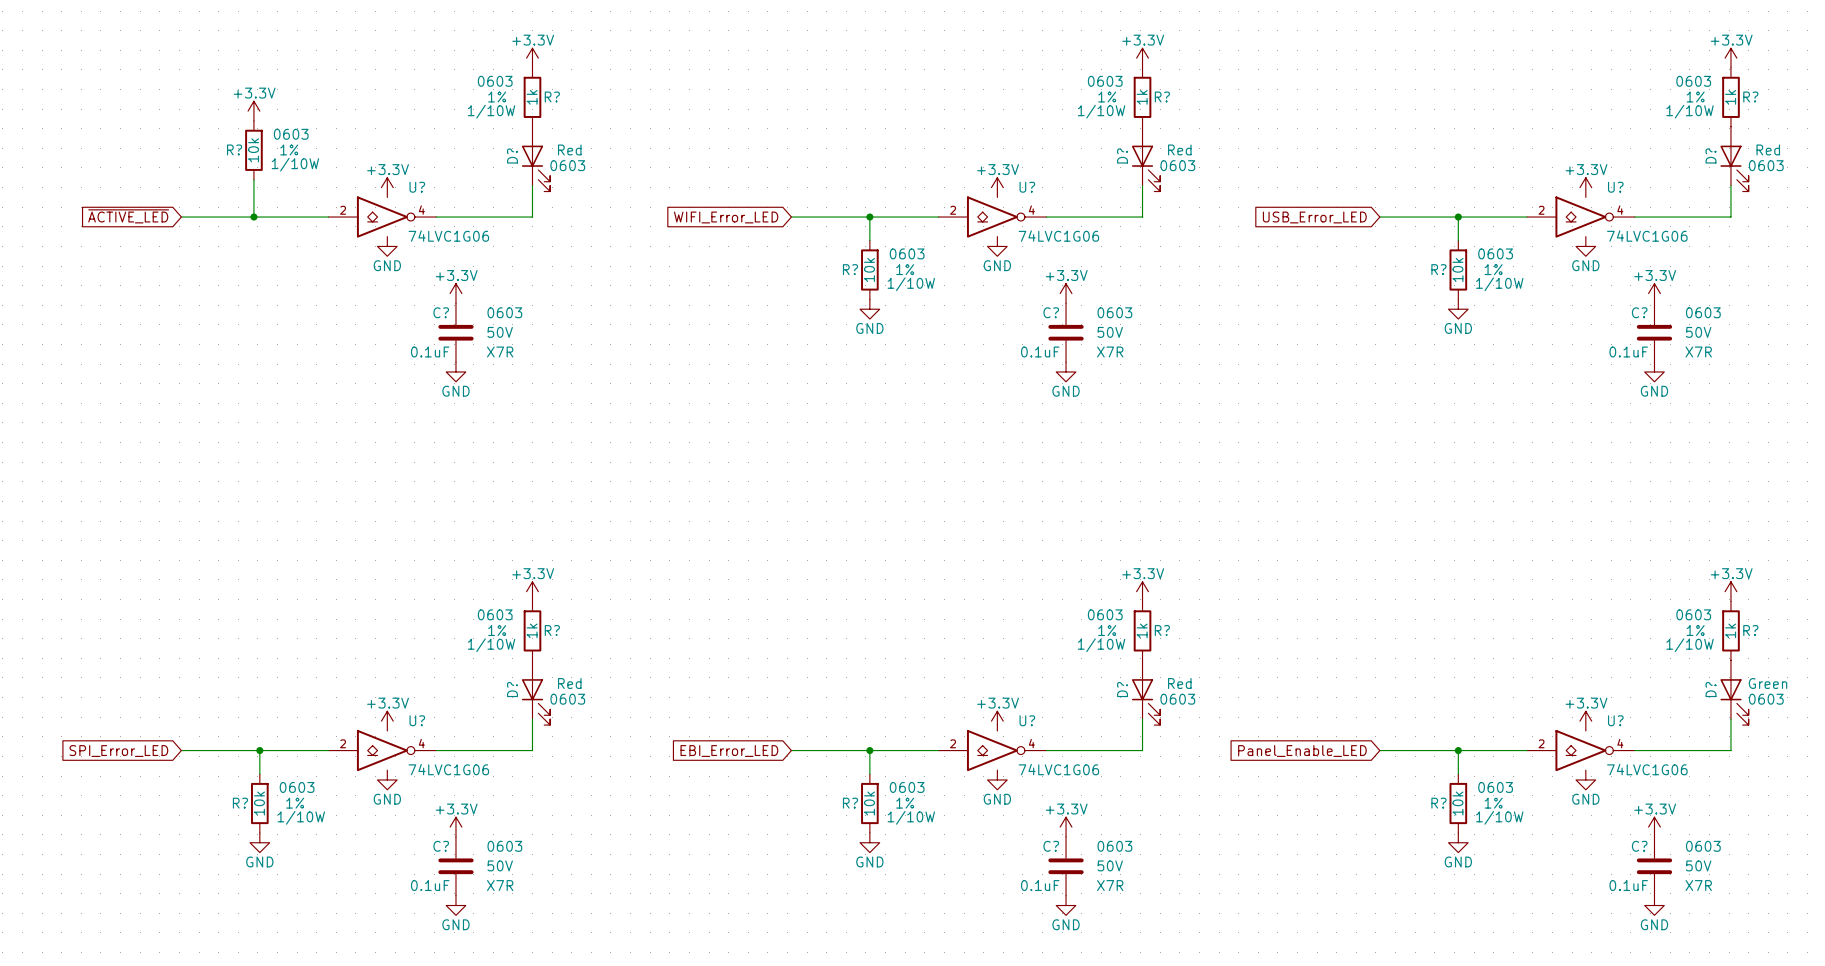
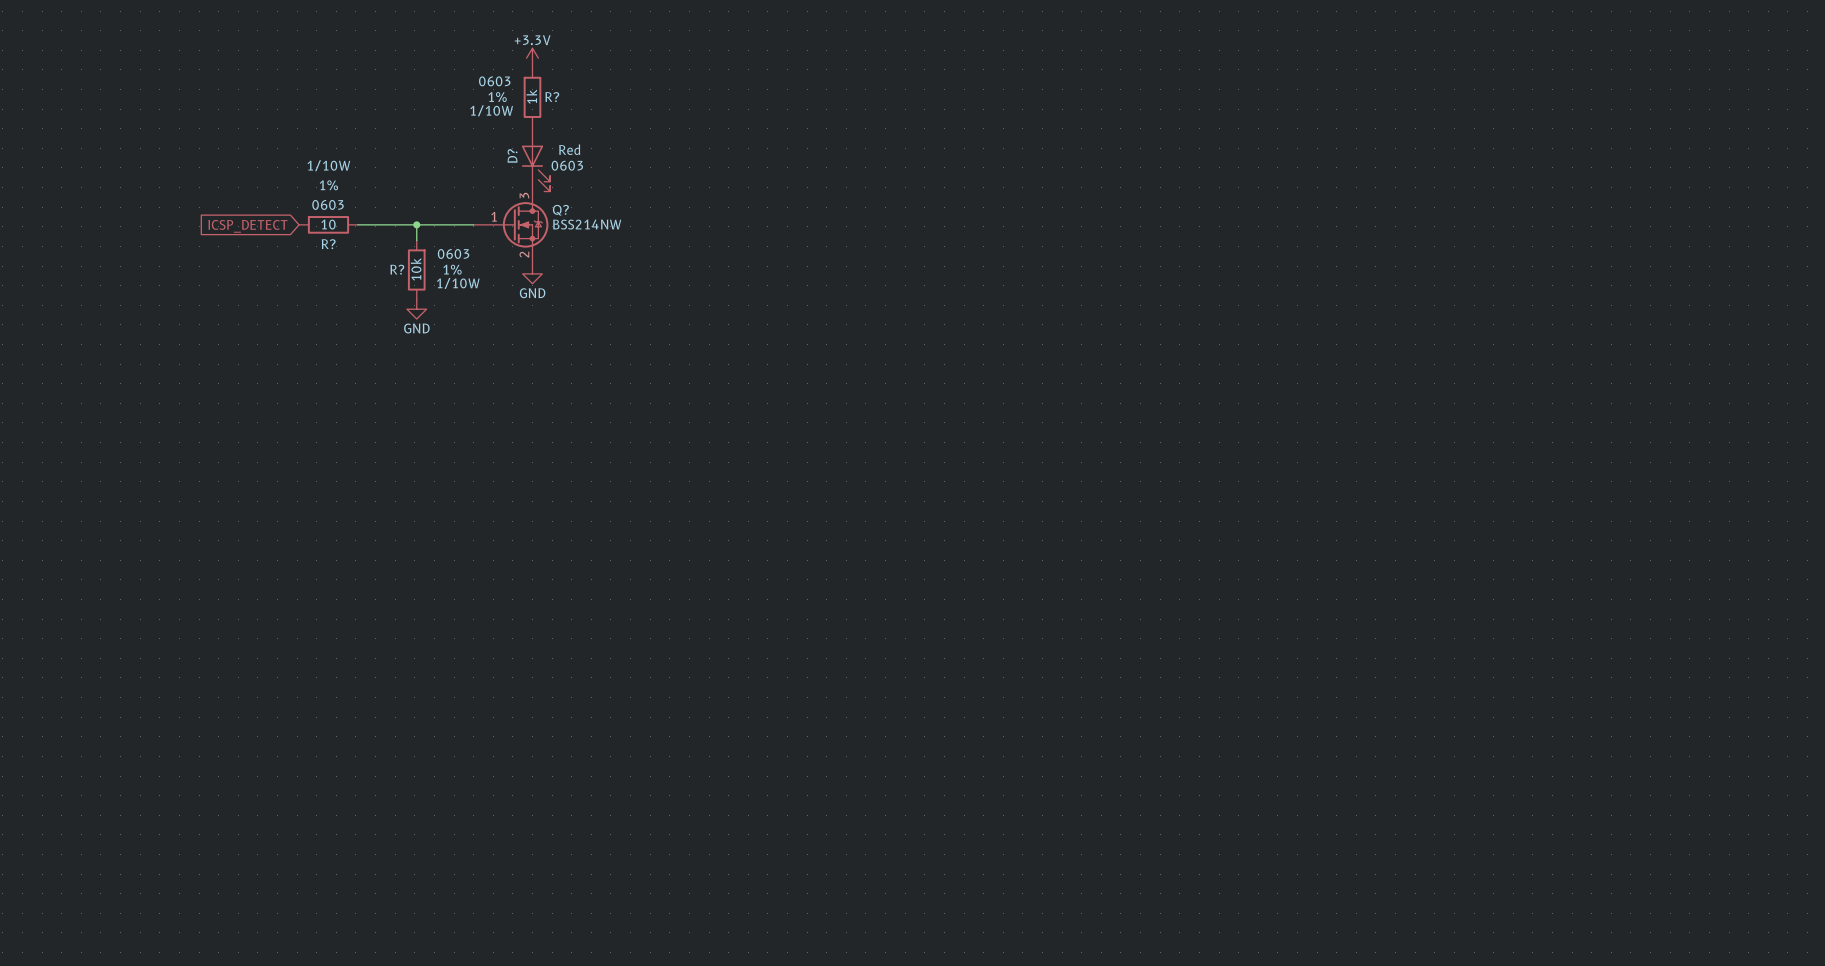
power symbol: +3.3V (1142, 58) -> none
power symbol: +3.3V (1730, 58) -> none
R?: 1k (1142, 97) -> none
R?: 1k (1730, 97) -> none
power symbol: +3.3V (253, 111) -> none
R?: 10k (253, 150) -> none
D?: Red (1146, 159) -> none
D?: Red (1734, 159) -> none
wire: (253, 179) (253, 217) -> none
wire: (532, 185) (532, 217) (436, 217) -> none
wire: (1142, 185) (1142, 217) (1046, 217) -> none
wire: (1730, 185) (1730, 217) (1634, 217) -> none
power symbol: +3.3V (387, 187) -> none
power symbol: +3.3V (997, 187) -> none
power symbol: +3.3V (1585, 187) -> none
global label: ~{ACTIVE_LED} (128, 216) -> none
wire: (181, 217) (328, 217) -> none
junction: (253, 217) -> none
U?: 74LVC1G06 (382, 217) -> none
global label: WIFI_Error_LED (726, 217) -> none
wire: (791, 217) (938, 217) -> none
wire: (869, 217) (869, 240) -> none
junction: (869, 217) -> none
U?: 74LVC1G06 (992, 217) -> none
global label: USB_Error_LED (1314, 217) -> none
wire: (1379, 217) (1526, 217) -> none
wire: (1458, 217) (1458, 240) -> none
junction: (1458, 217) -> none
U?: 74LVC1G06 (1580, 217) -> none
R?: none -> 10 (328, 224)
wire: none -> (357, 224) (473, 224)
wire: none -> (416, 224) (416, 240)
junction: none -> (416, 224)
Q?: none -> BSS214NW (511, 224)
global label: none -> ICSP_DETECT (247, 226)
power symbol: GND (387, 246) -> none
power symbol: GND (997, 246) -> none
power symbol: GND (1585, 246) -> none
R?: none -> 10k (416, 269)
R?: 10k (869, 269) -> none
R?: 10k (1458, 269) -> none
power symbol: none -> GND (532, 273)
power symbol: +3.3V (455, 293) -> none
power symbol: +3.3V (1066, 293) -> none
power symbol: +3.3V (1654, 293) -> none
power symbol: none -> GND (416, 309)
power symbol: GND (869, 309) -> none
power symbol: GND (1458, 309) -> none
C?: 0.1uF (455, 332) -> none
C?: 0.1uF (1066, 332) -> none
C?: 0.1uF (1654, 332) -> none
power symbol: GND (455, 371) -> none
power symbol: GND (1066, 371) -> none
power symbol: GND (1654, 371) -> none
power symbol: +3.3V (532, 591) -> none
power symbol: +3.3V (1142, 591) -> none
power symbol: +3.3V (1730, 591) -> none
R?: 1k (532, 630) -> none
R?: 1k (1142, 630) -> none
R?: 1k (1730, 630) -> none
D?: Red (536, 692) -> none
D?: Red (1146, 692) -> none
D?: Green (1734, 692) -> none
wire: (532, 719) (532, 750) (436, 750) -> none
wire: (1142, 719) (1142, 750) (1046, 750) -> none
wire: (1730, 719) (1730, 750) (1634, 750) -> none
power symbol: +3.3V (387, 721) -> none
power symbol: +3.3V (997, 721) -> none
power symbol: +3.3V (1585, 721) -> none
wire: (181, 750) (328, 750) -> none
wire: (259, 750) (259, 774) -> none
junction: (259, 750) -> none
U?: 74LVC1G06 (382, 750) -> none
wire: (791, 750) (938, 750) -> none
wire: (869, 750) (869, 774) -> none
junction: (869, 750) -> none
U?: 74LVC1G06 (992, 750) -> none
wire: (1379, 750) (1526, 750) -> none
wire: (1458, 750) (1458, 774) -> none
junction: (1458, 750) -> none
U?: 74LVC1G06 (1580, 750) -> none
global label: SPI_Error_LED (118, 751) -> none
global label: EBI_Error_LED (729, 751) -> none
global label: Panel_Enable_LED (1302, 751) -> none
power symbol: GND (387, 779) -> none
power symbol: GND (997, 779) -> none
power symbol: GND (1585, 779) -> none
R?: 10k (259, 803) -> none
R?: 10k (869, 803) -> none
R?: 10k (1458, 803) -> none
power symbol: +3.3V (455, 827) -> none
power symbol: +3.3V (1066, 827) -> none
power symbol: +3.3V (1654, 827) -> none
power symbol: GND (259, 842) -> none
power symbol: GND (869, 842) -> none
power symbol: GND (1458, 842) -> none
C?: 0.1uF (455, 866) -> none
C?: 0.1uF (1066, 866) -> none
C?: 0.1uF (1654, 866) -> none
power symbol: GND (455, 905) -> none
power symbol: GND (1066, 905) -> none
power symbol: GND (1654, 905) -> none

